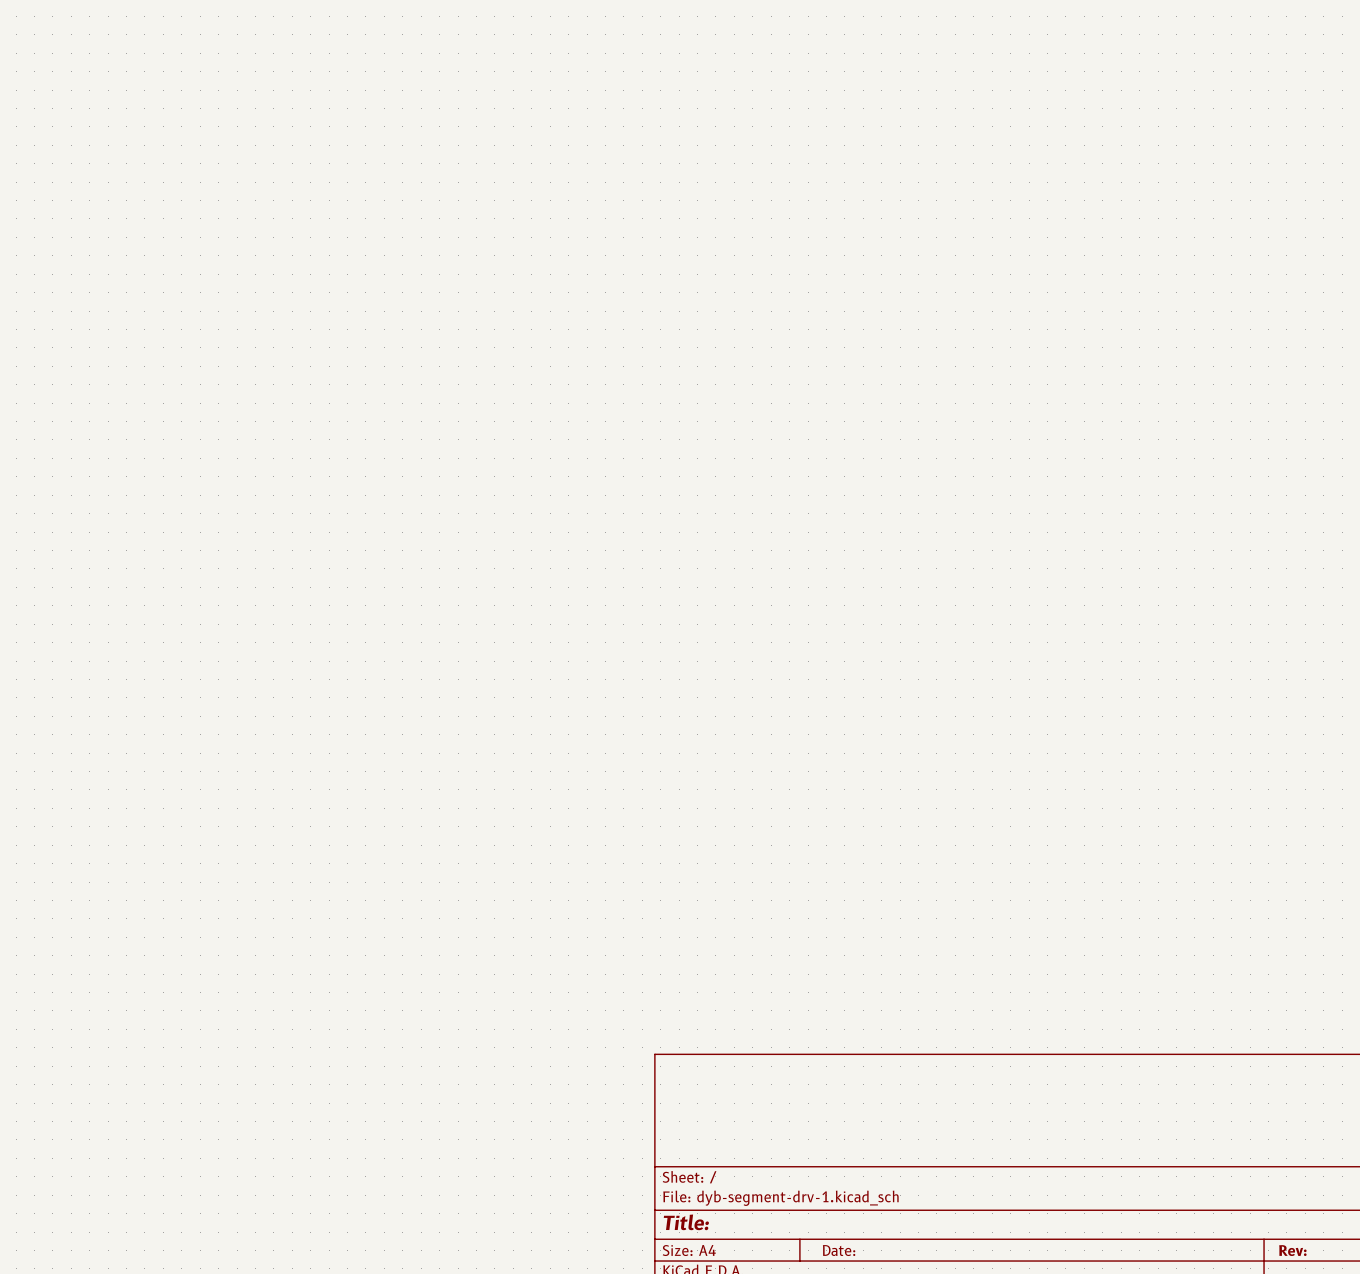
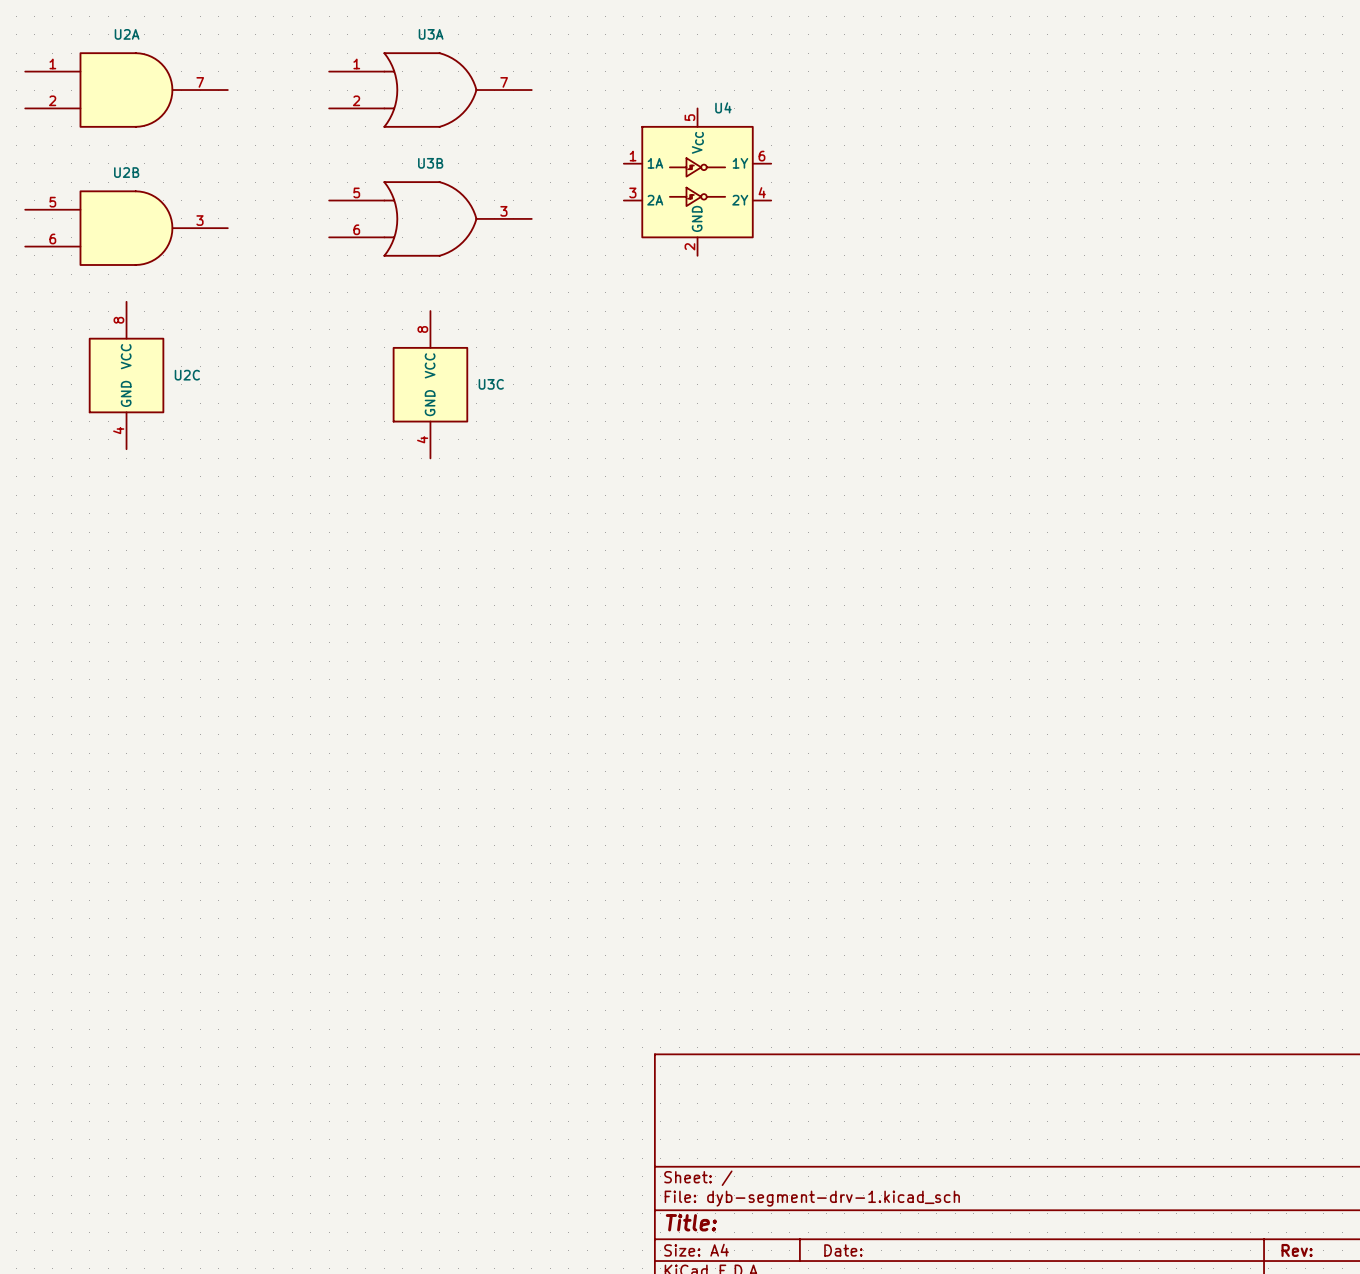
U2A: none -> (126, 90)
U3A: none -> (430, 90)
U4: none -> (697, 182)
U3B: none -> (430, 218)
U2B: none -> (126, 228)
U2C: none -> (126, 375)
U3C: none -> (430, 384)

